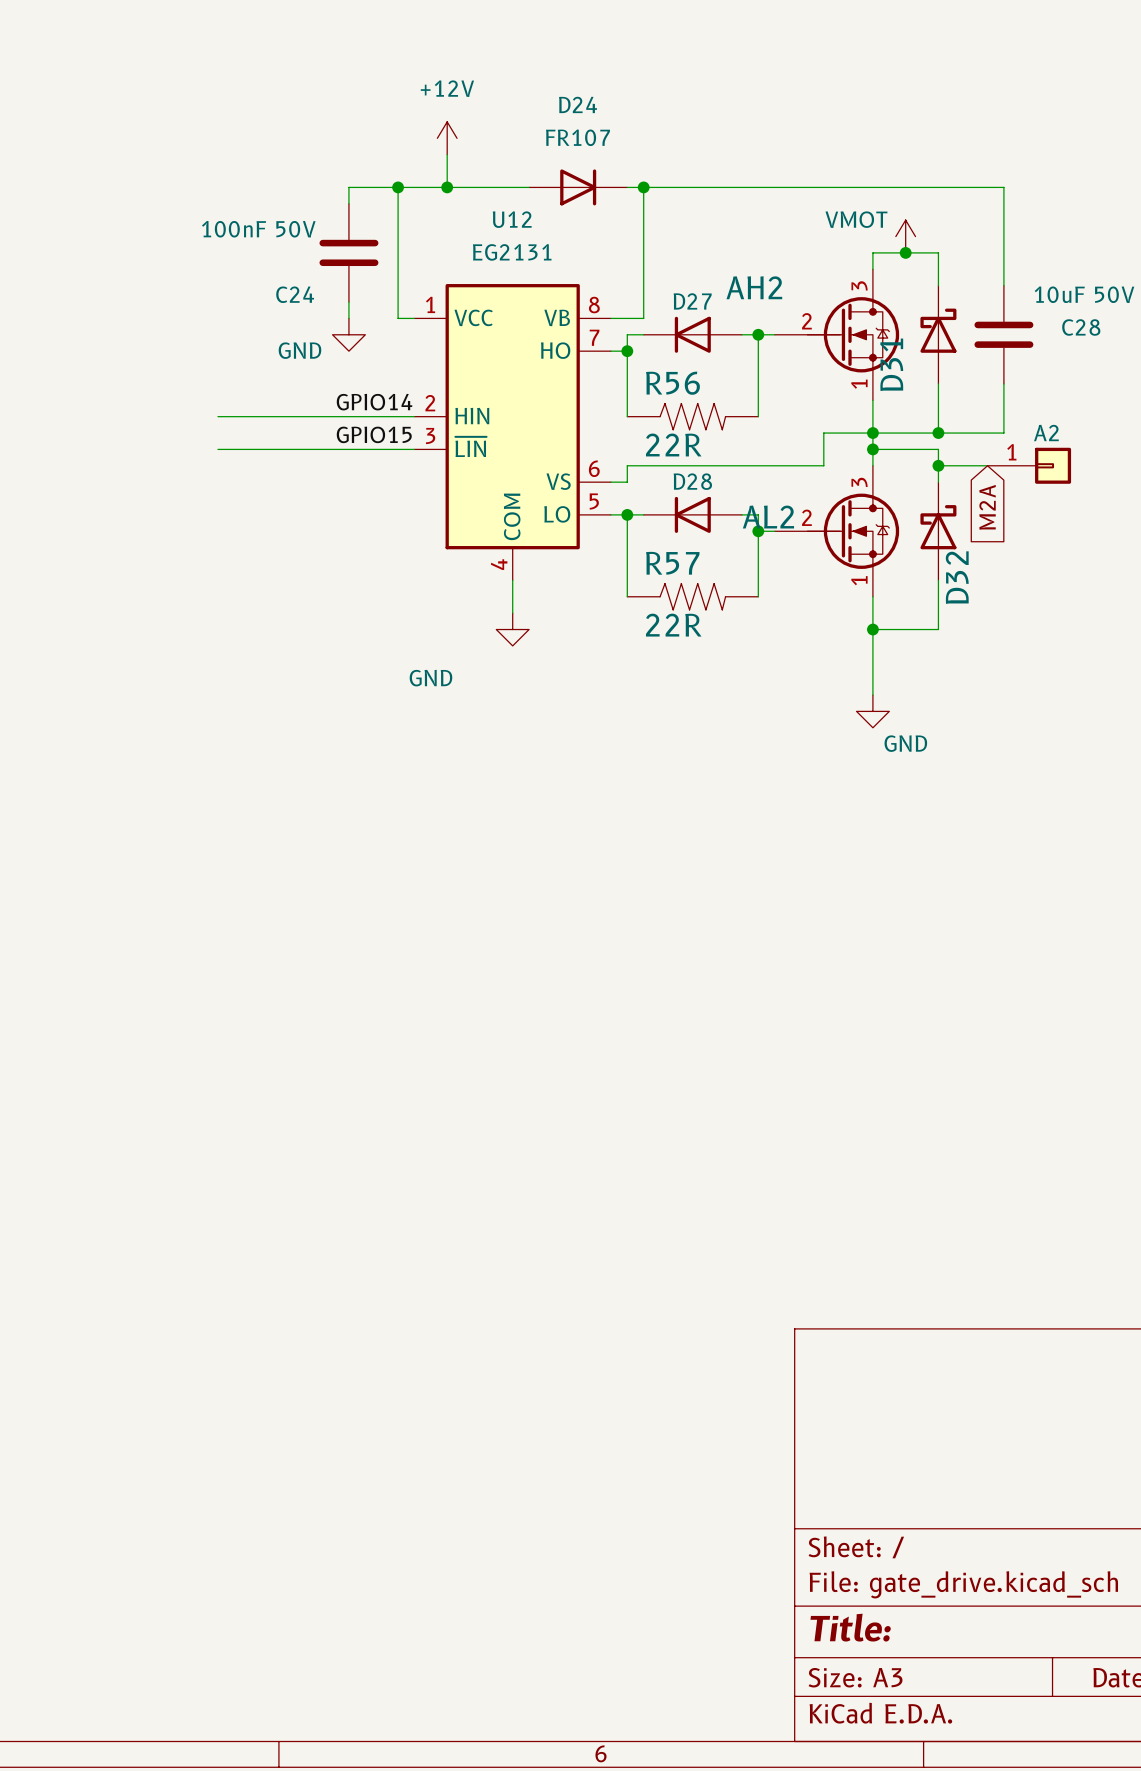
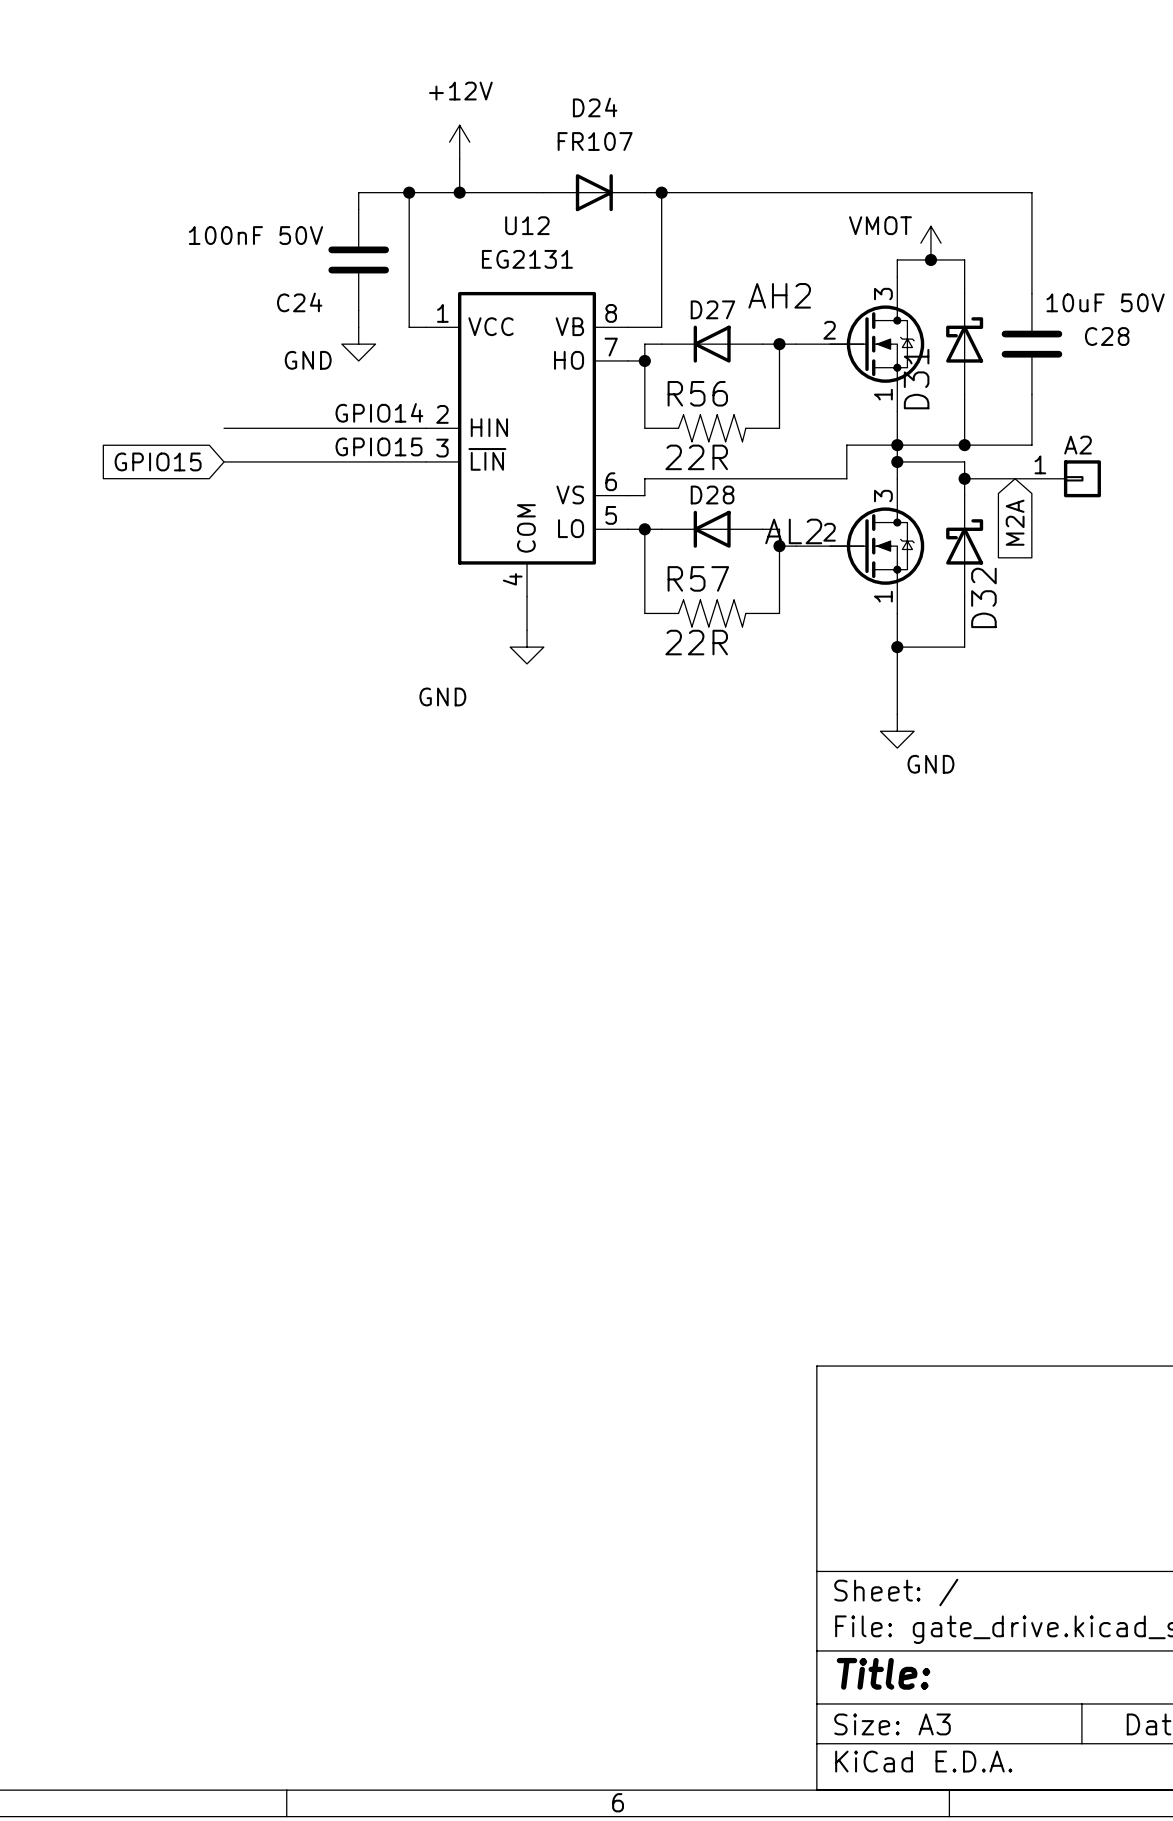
global label: none -> GPIO15 (158, 461)

